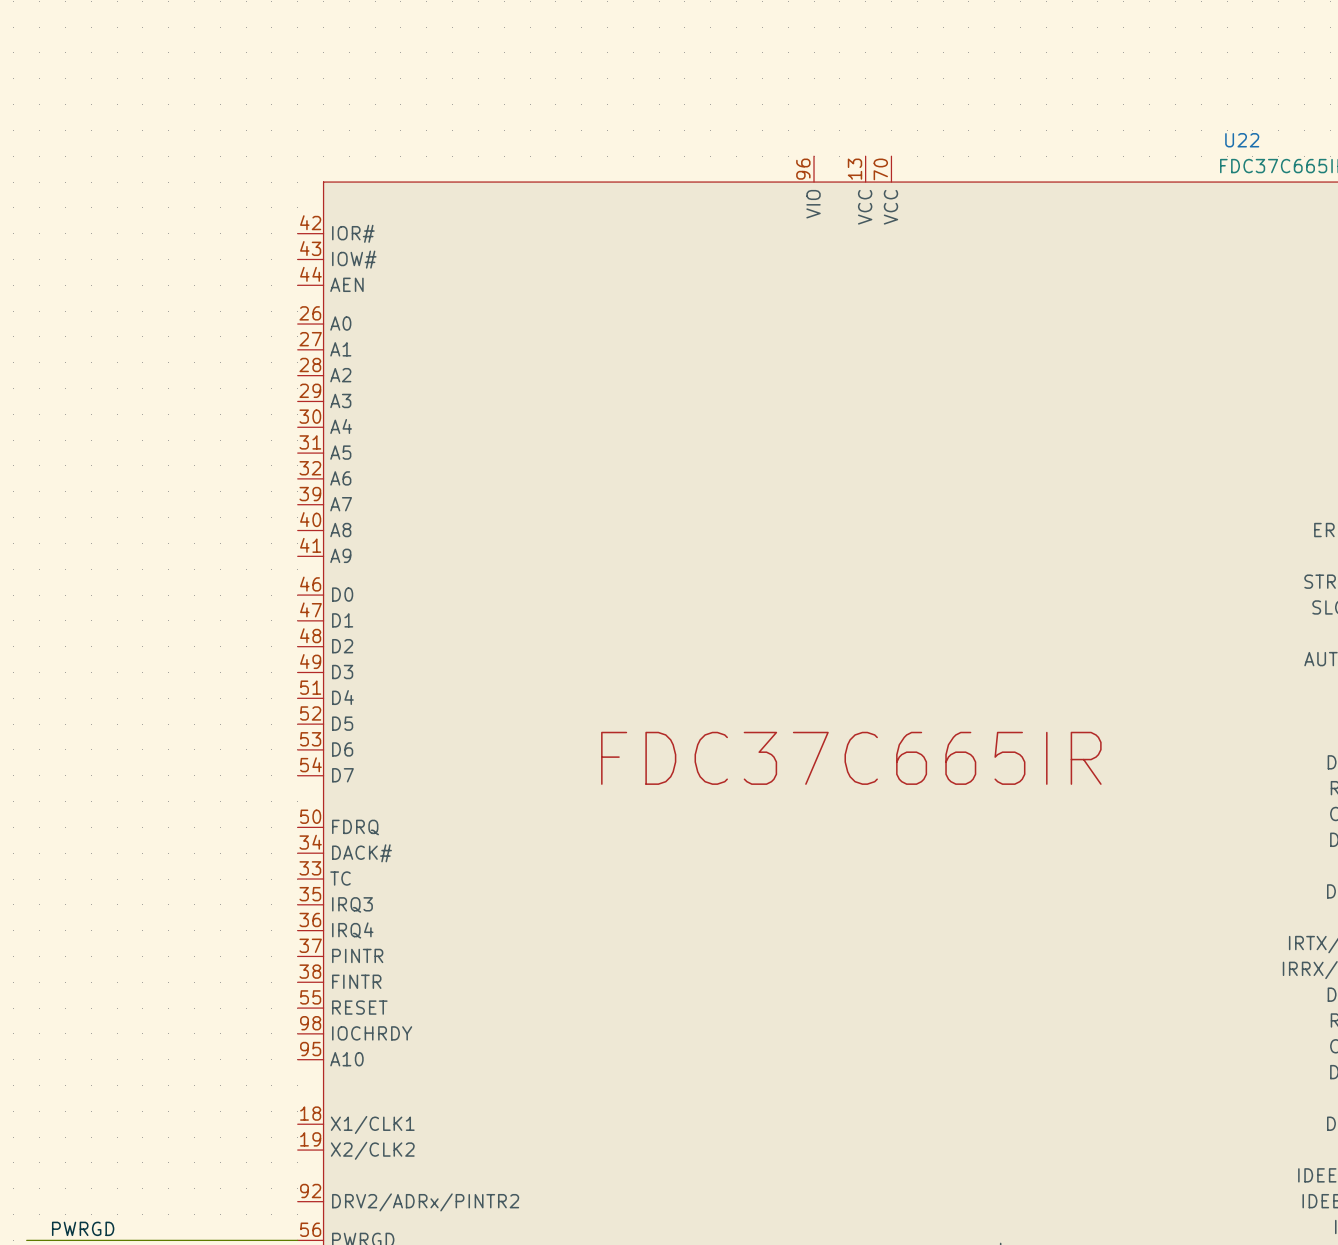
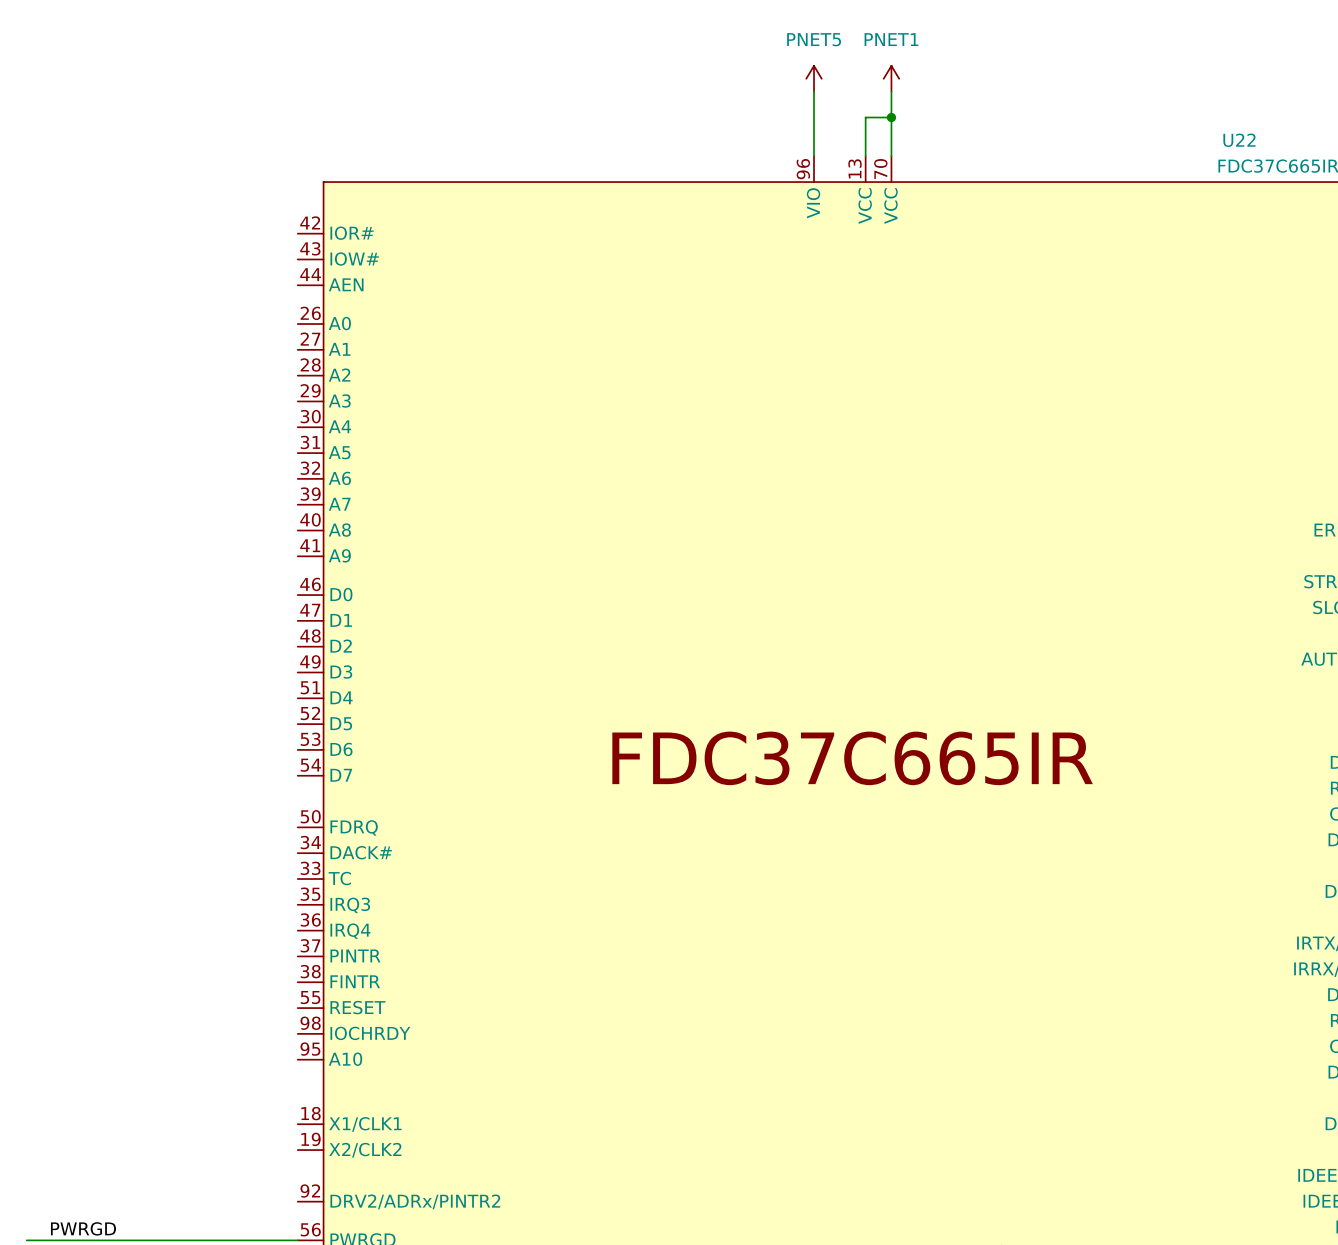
power symbol: none -> PNET5 (814, 78)
power symbol: none -> PNET1 (891, 78)
wire: none -> (814, 91) (814, 156)
wire: none -> (891, 91) (891, 156)
wire: none -> (891, 117) (865, 117) (865, 156)
junction: none -> (891, 117)

